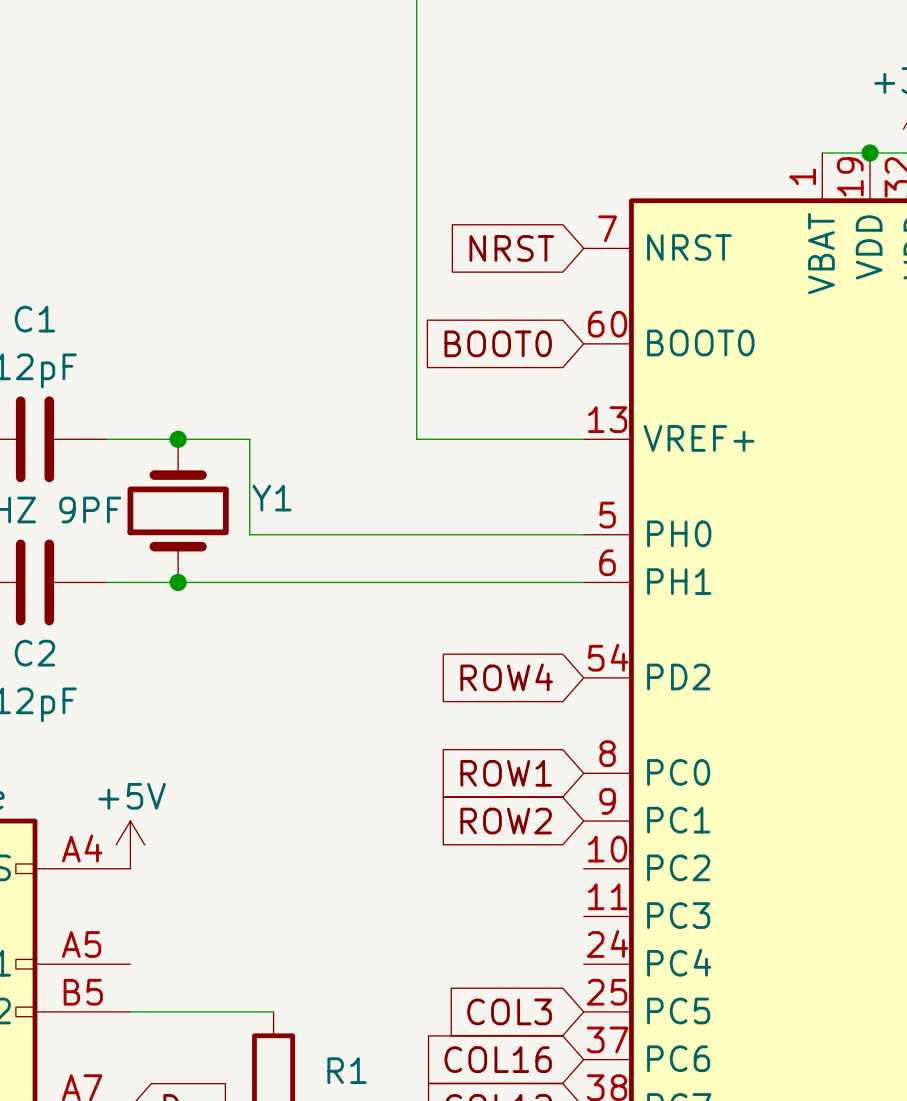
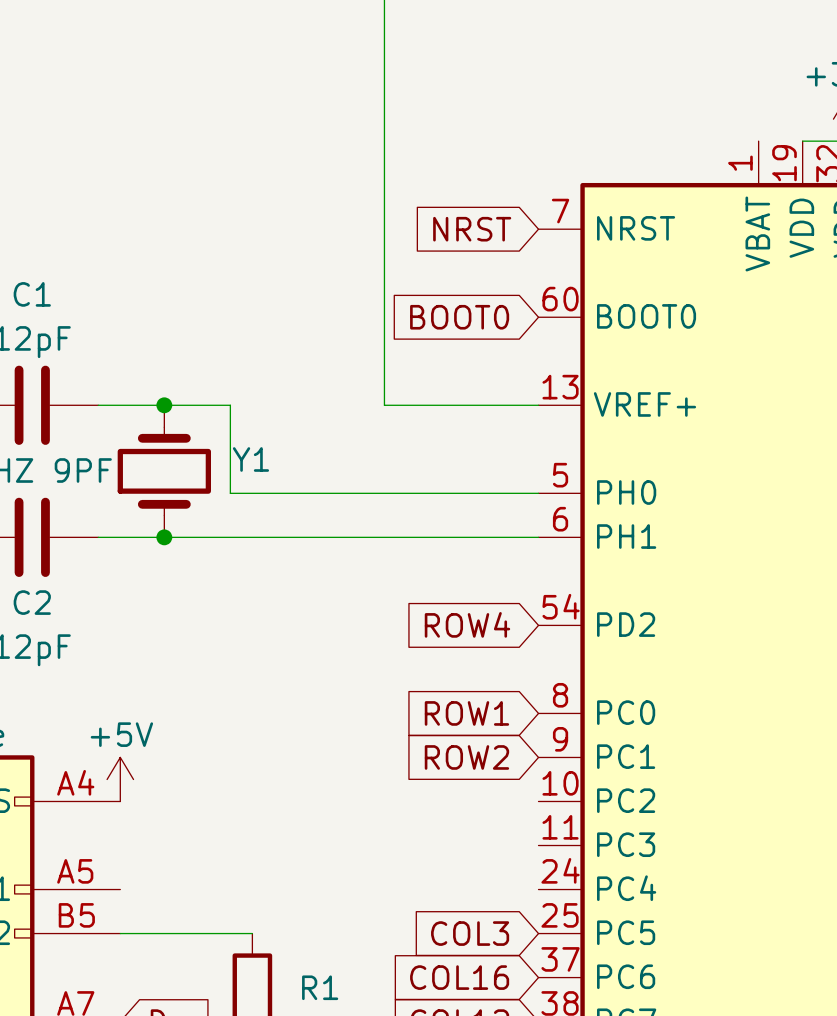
wire: (822, 153) (870, 153) -> none
junction: (870, 153) -> none

